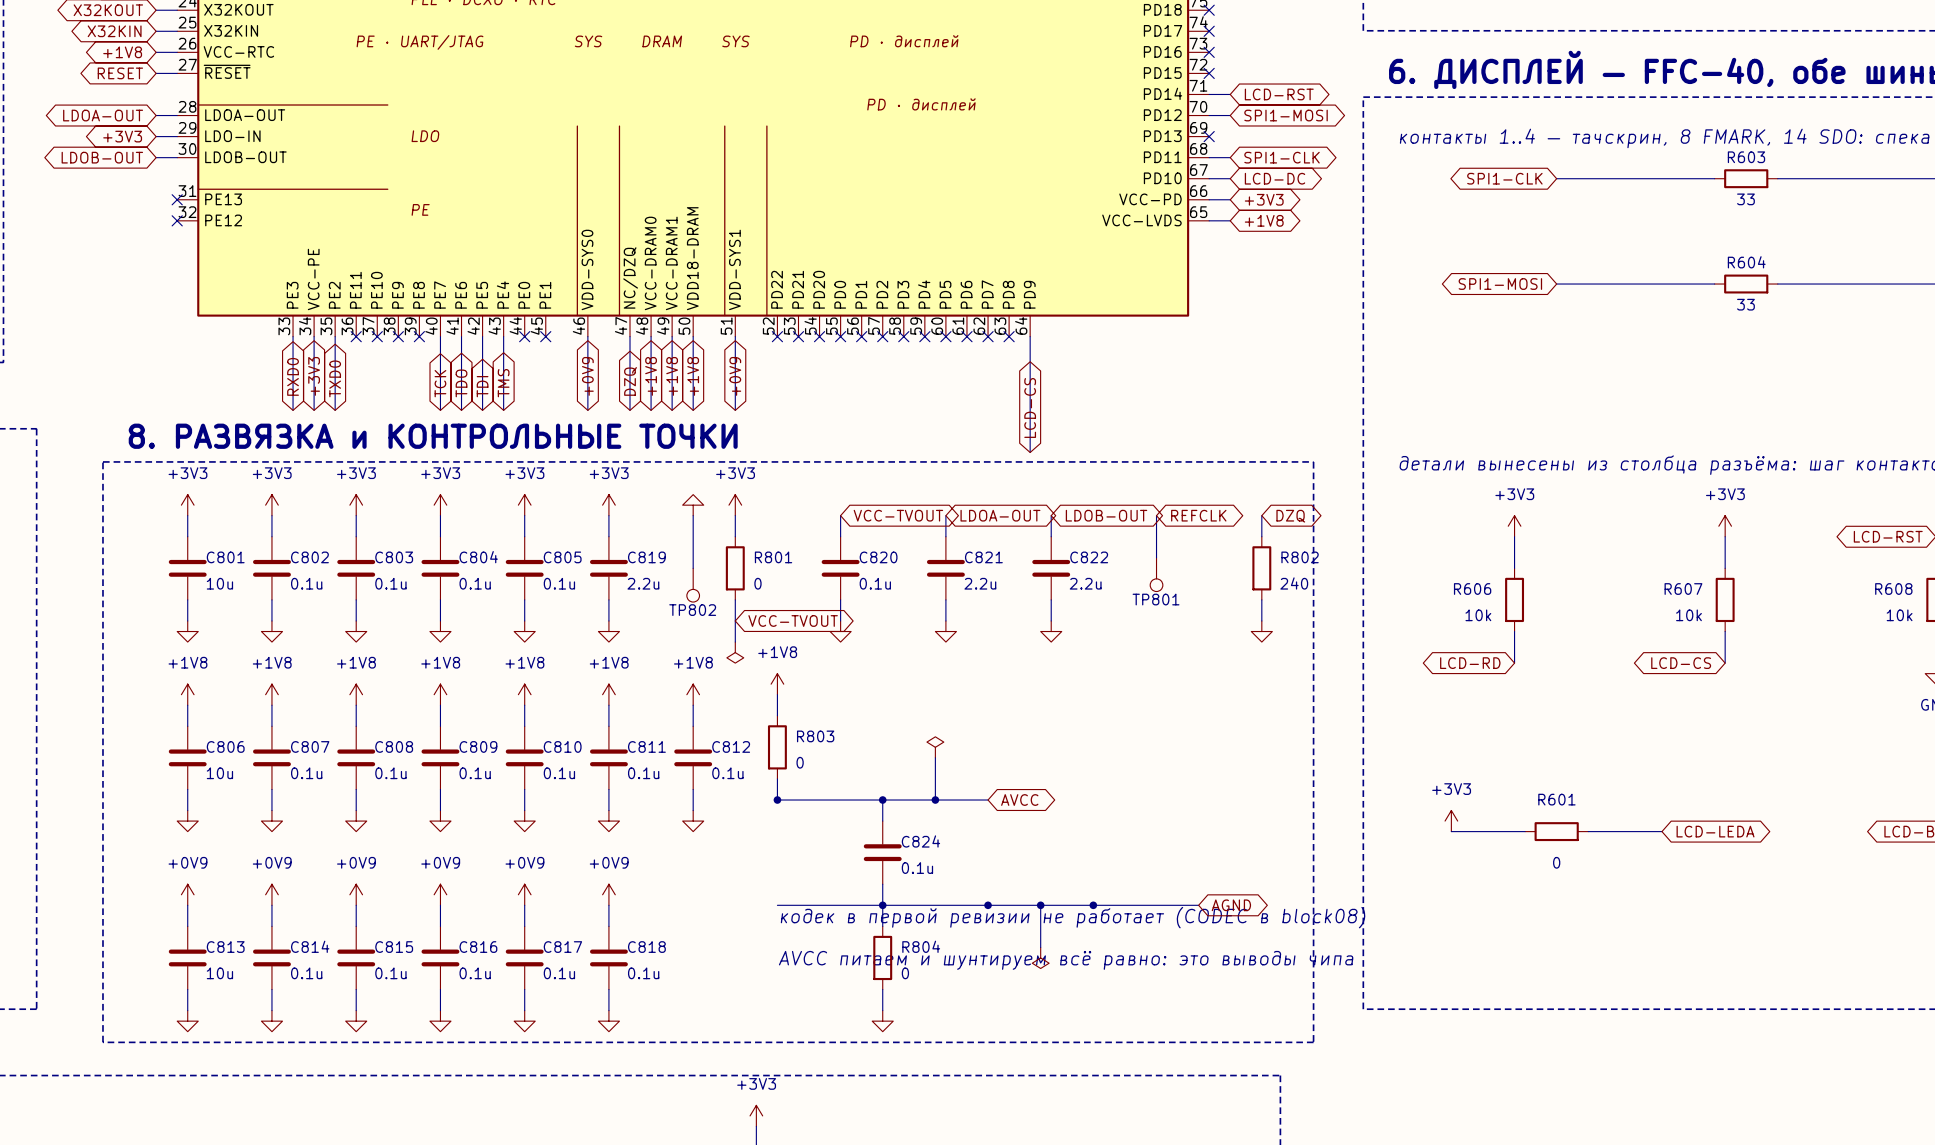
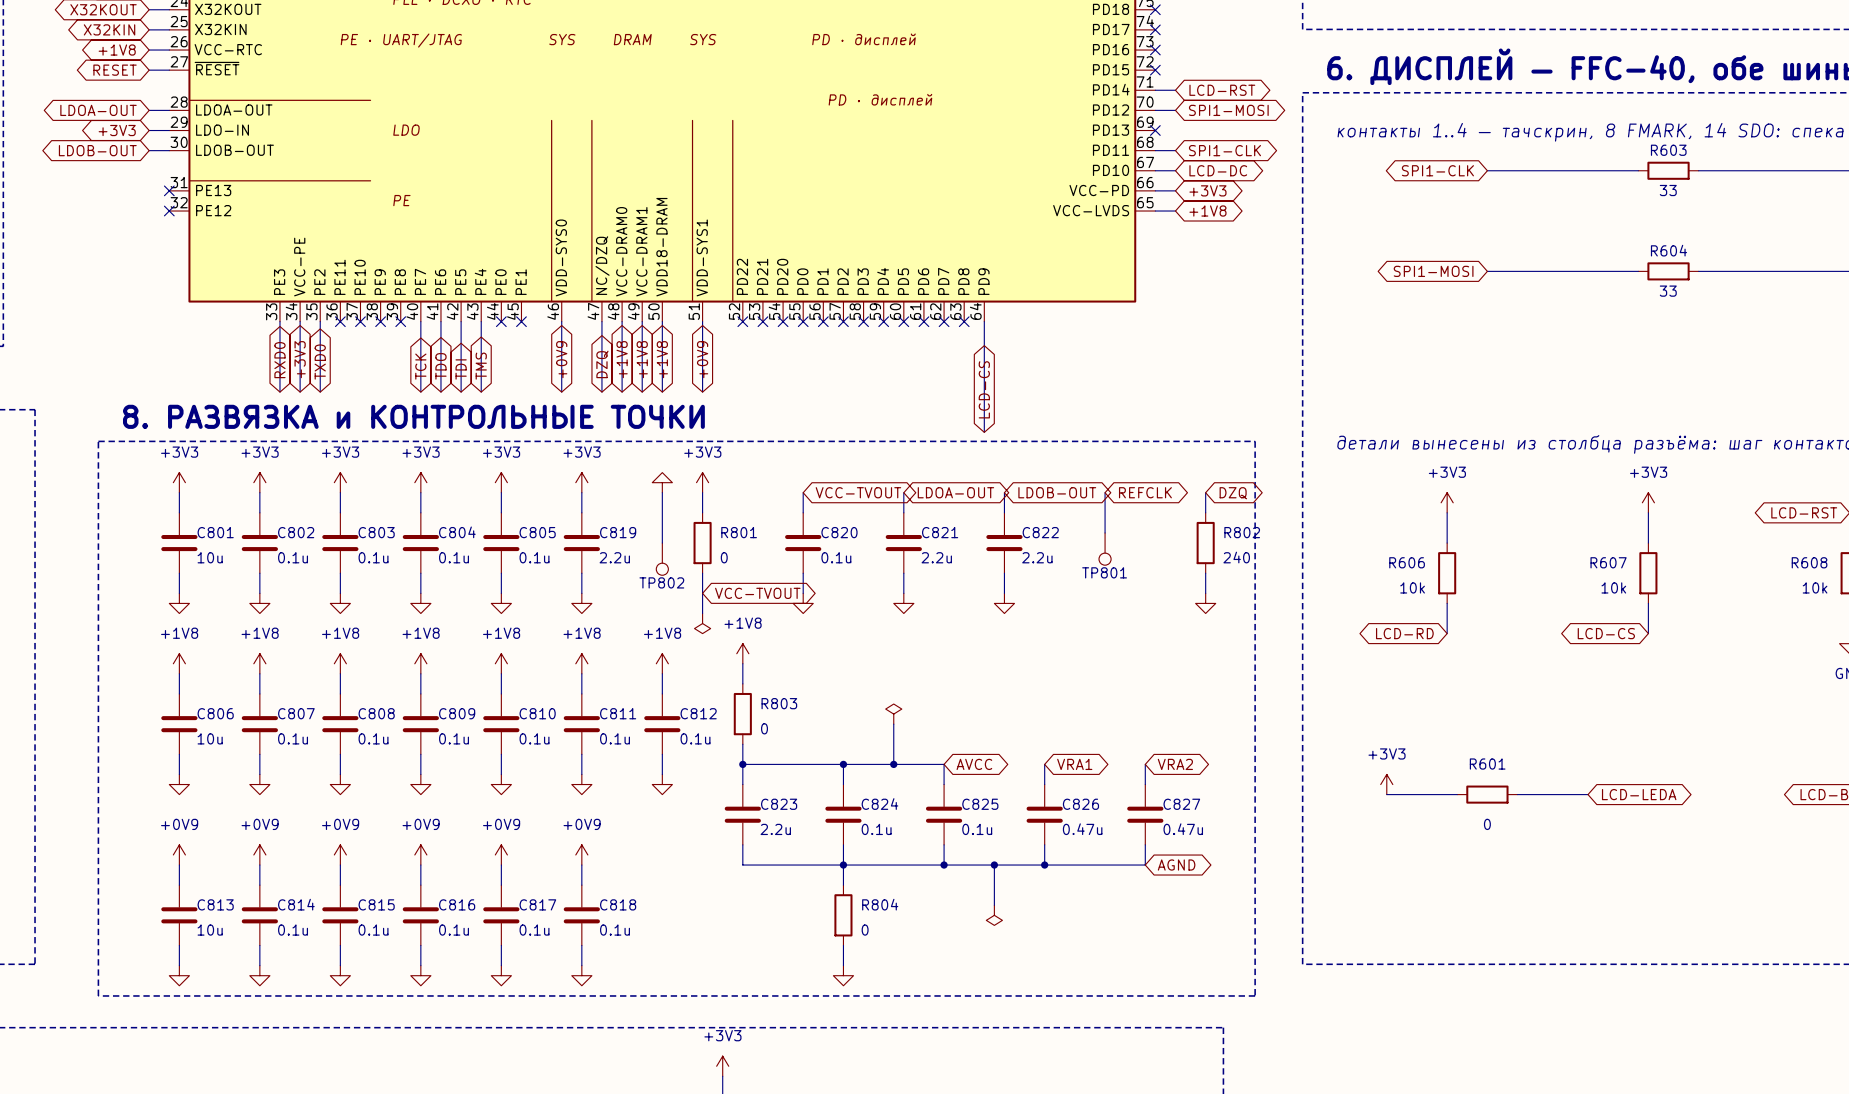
wire: none -> (742, 764) (742, 784)
wire: none -> (944, 764) (944, 784)
wire: none -> (1044, 764) (1044, 784)
global label: none -> VRA1 (1074, 764)
wire: none -> (1145, 764) (1145, 784)
global label: none -> VRA2 (1175, 764)
C823: none -> 2.2u (742, 814)
C825: none -> 0.1u (944, 814)
C826: none -> 0.47u (1044, 814)
C827: none -> 0.47u (1145, 814)
wire: none -> (742, 844) (742, 865)
wire: none -> (944, 844) (944, 865)
wire: none -> (1044, 844) (1044, 865)
wire: none -> (1145, 844) (1145, 865)
text: кодек в первой ревизии не работает (CODEC в block08) (1073, 917) -> none
text: AVCC питаем и шунтируем всё равно: это выводы чипа (1066, 960) -> none

